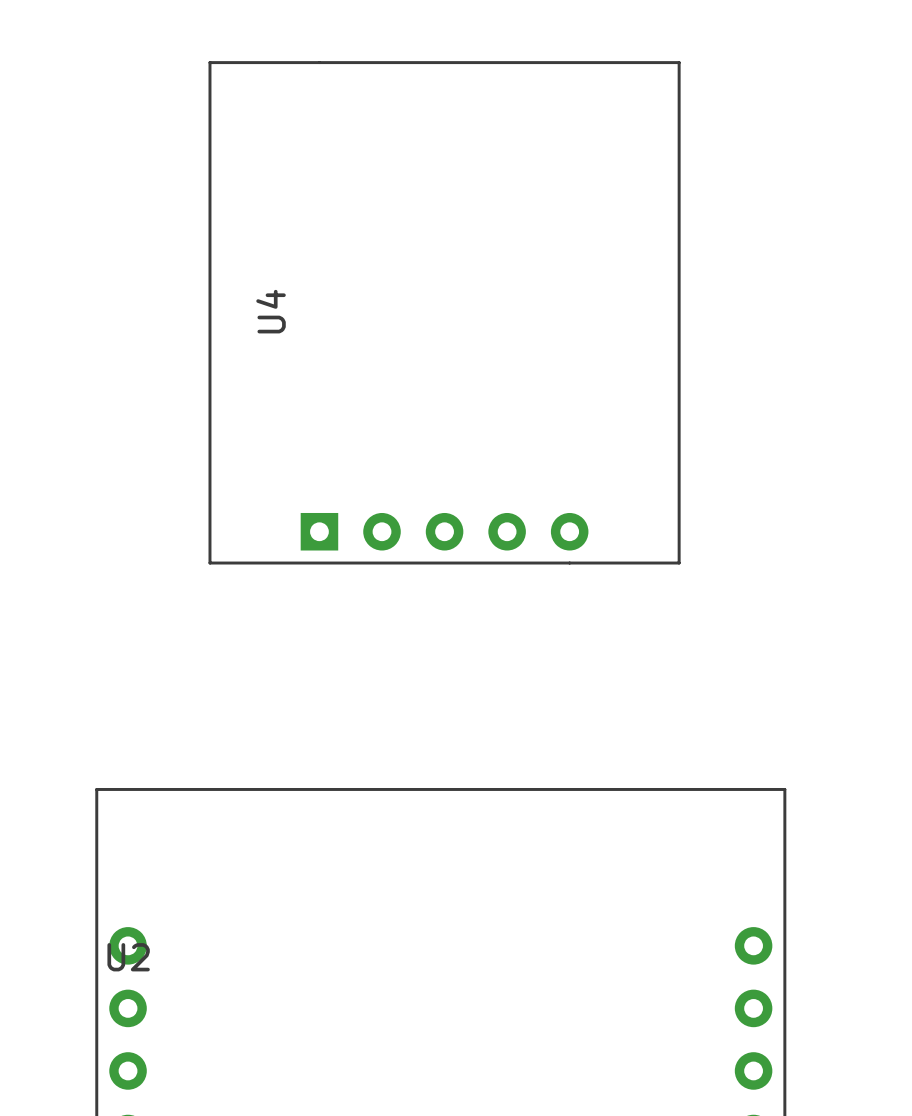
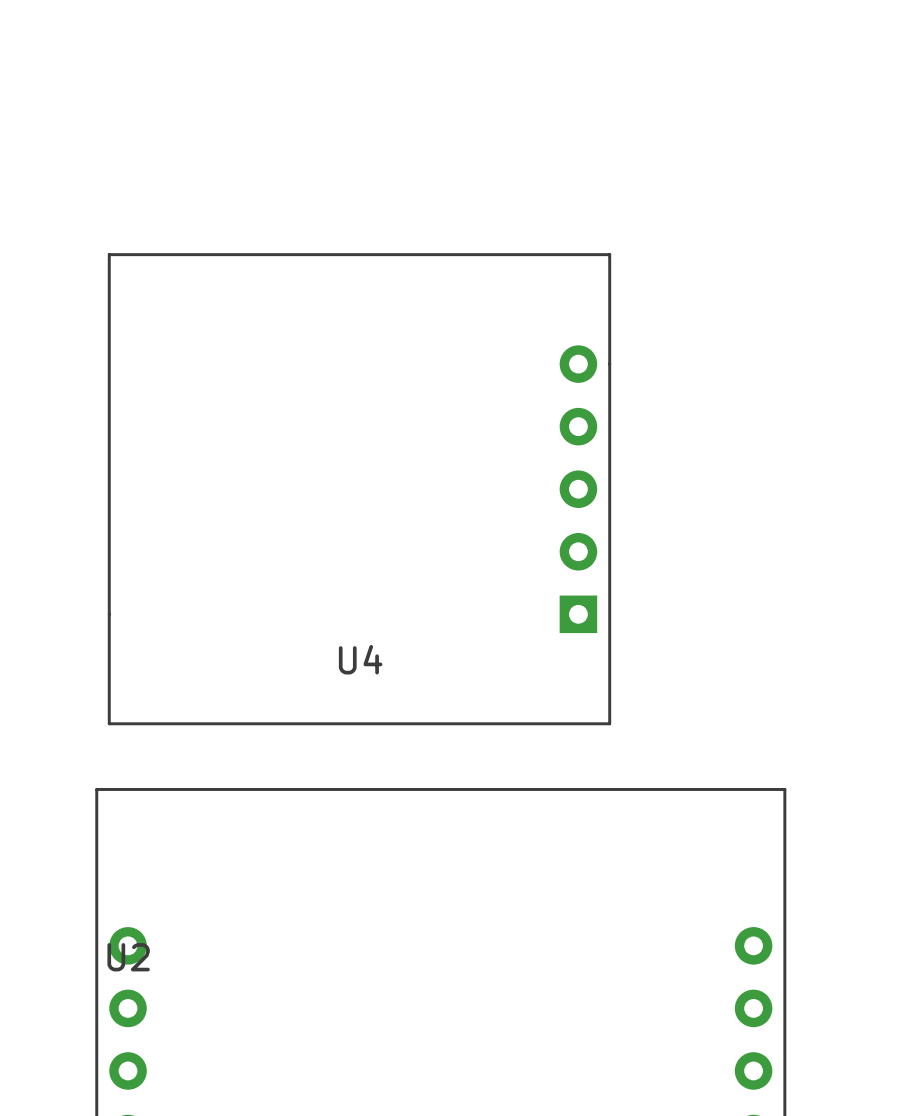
U4 rotation: 0° (444, 312) -> 90° counterclockwise (359, 489)

